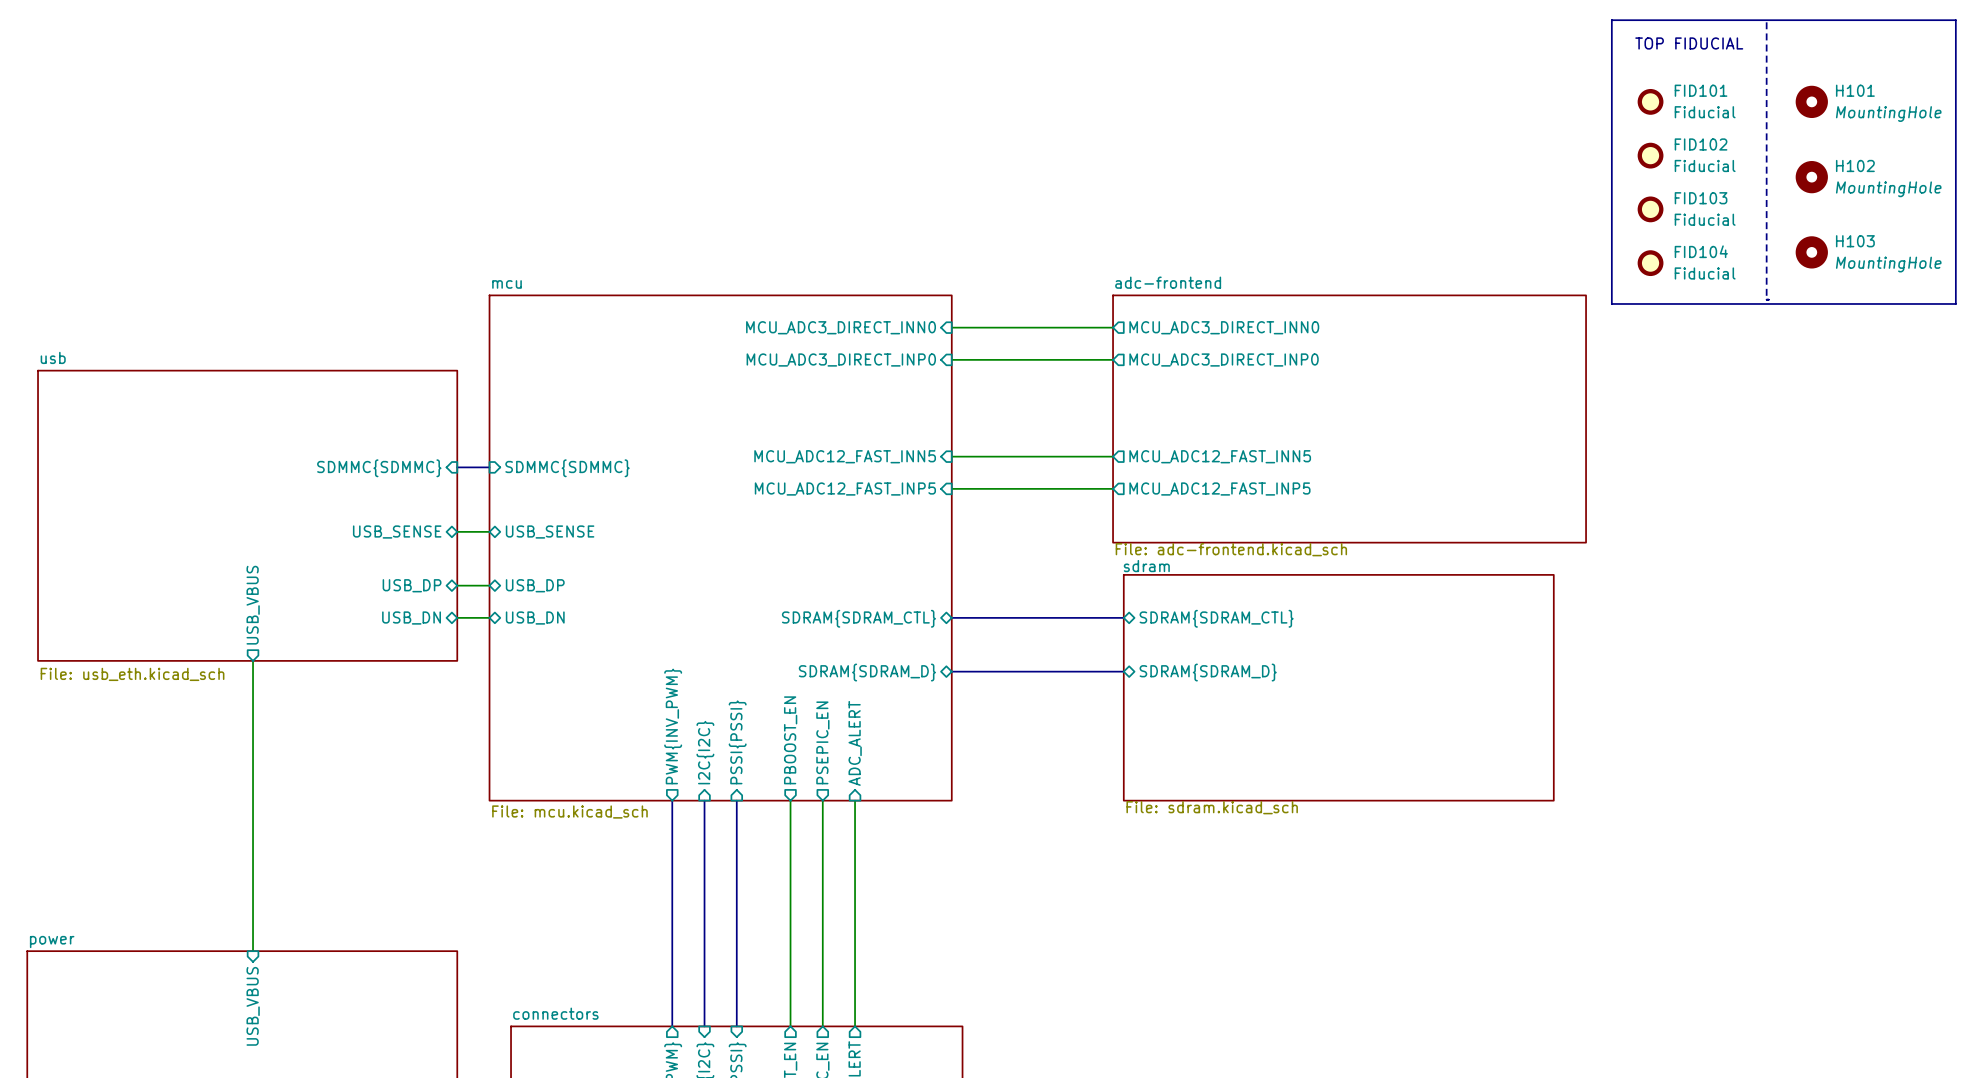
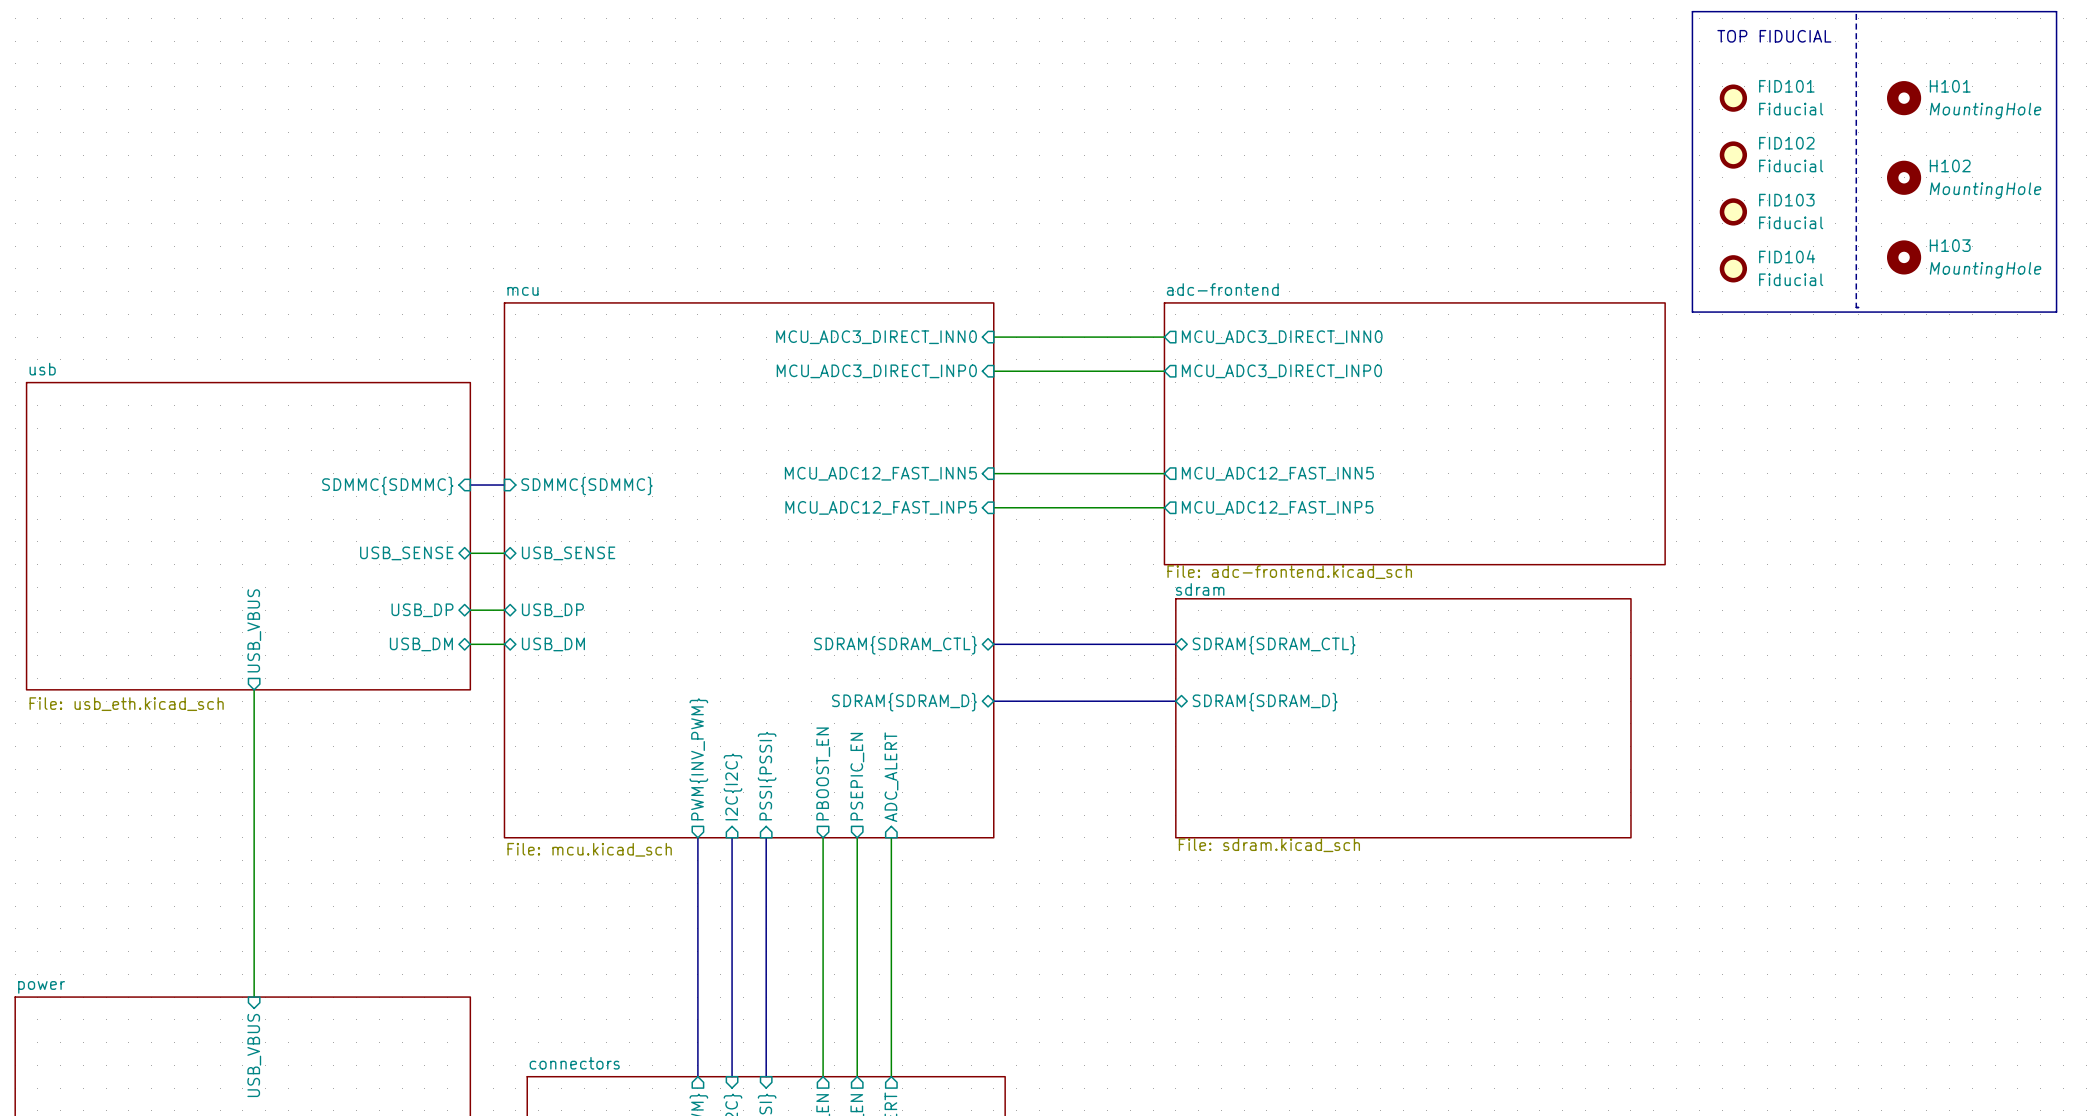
sheet pin: USB_DN (411, 618) -> USB_DM (421, 644)
sheet pin: USB_DN (535, 618) -> USB_DM (553, 644)

